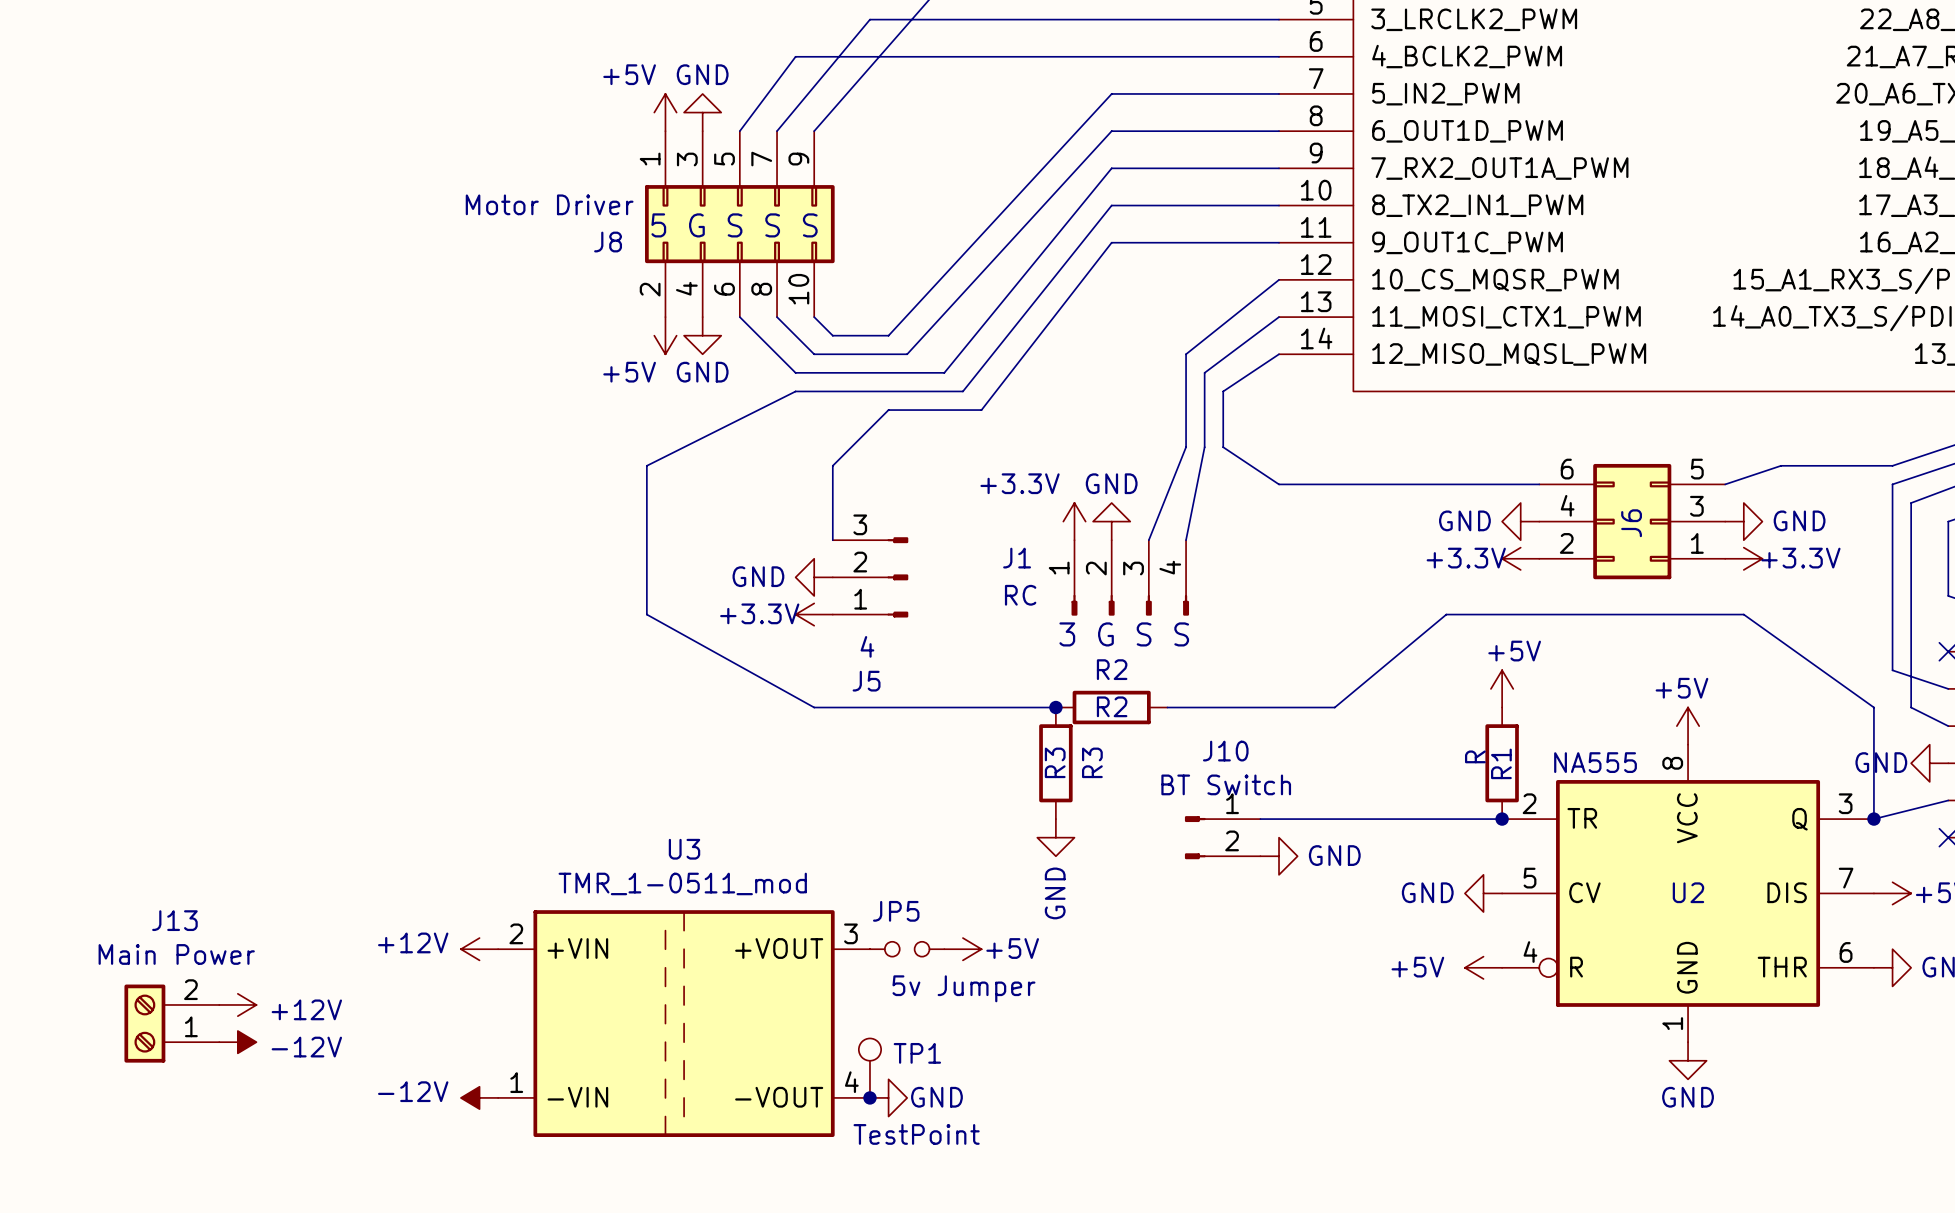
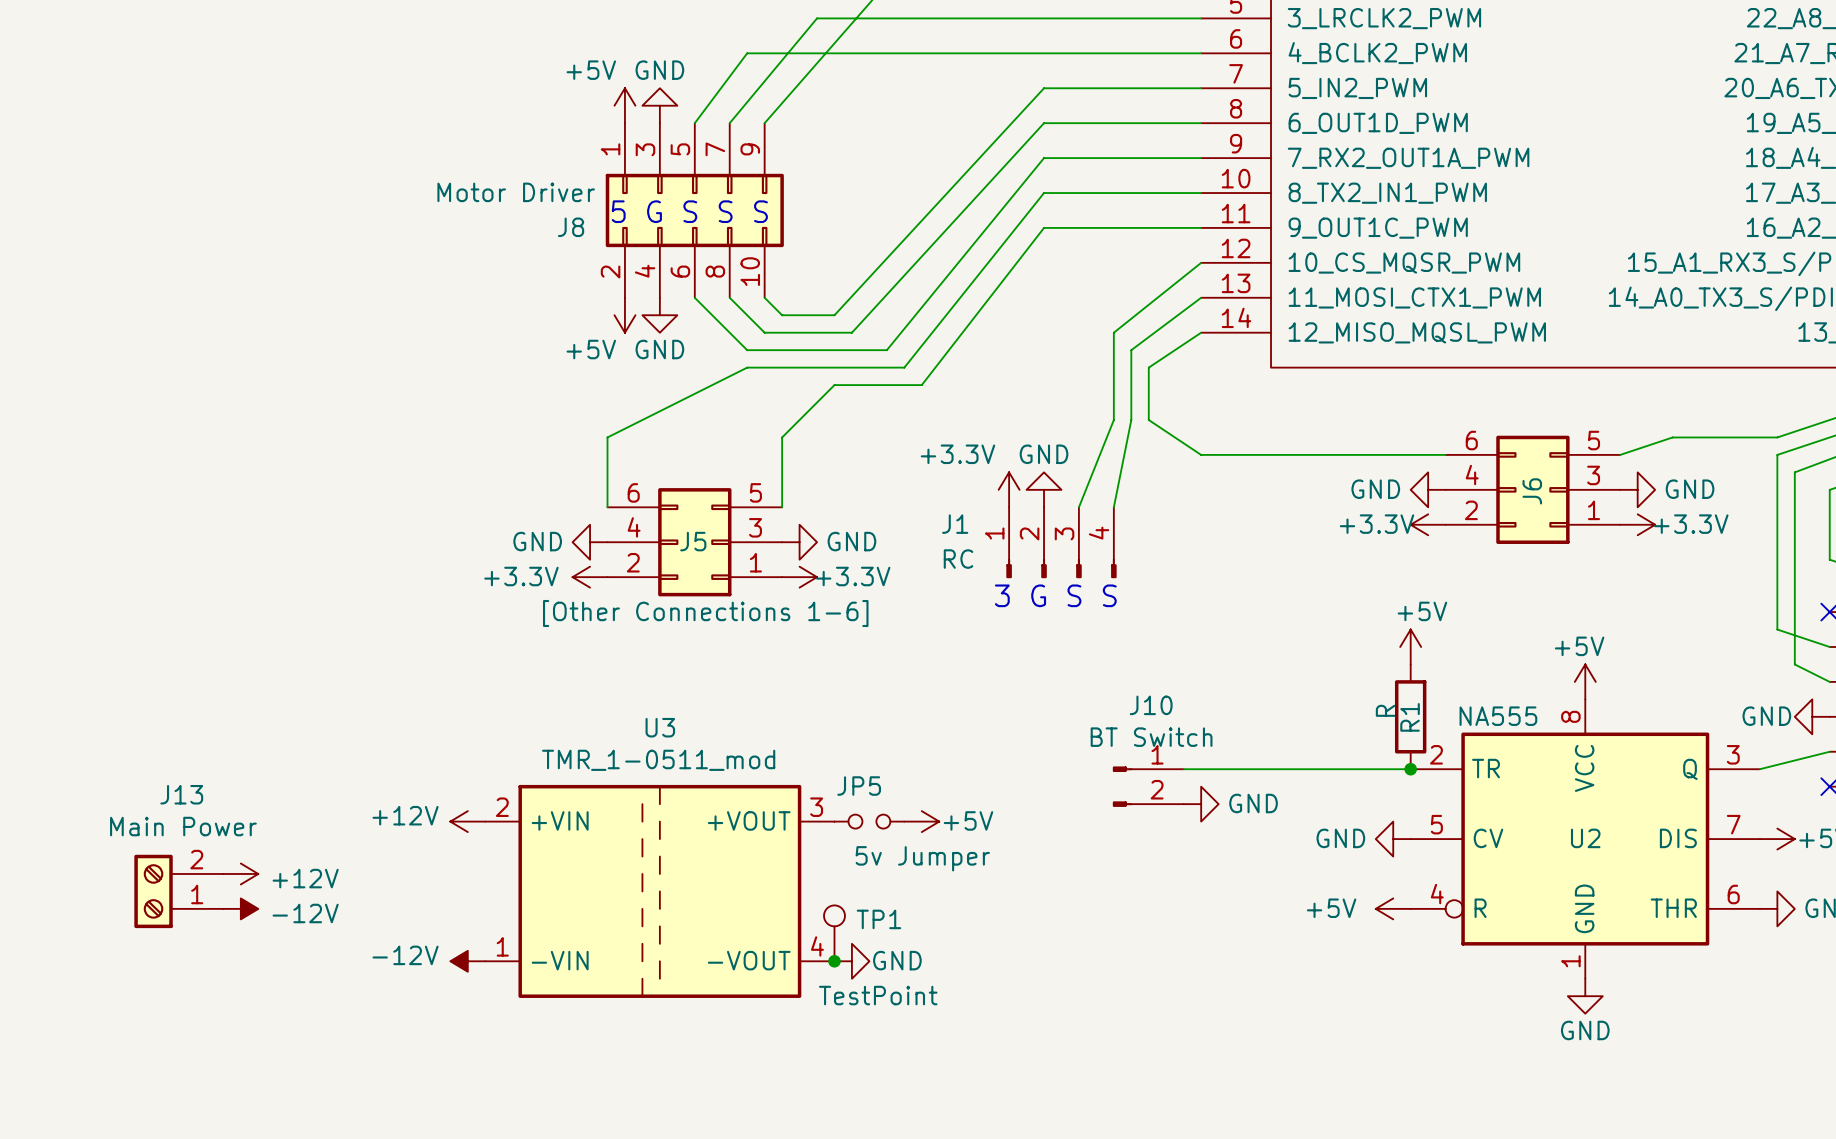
J5 symbol: [832, 537, 909, 618] -> [607, 488, 783, 597]
wire: (646, 540) (646, 614) (814, 707) (1055, 707) -> none
power symbol: none -> GND (590, 542)
power symbol rotation: 0° (814, 577) -> 180° (799, 542)
power symbol position: GND (814, 577) -> GND (799, 542)
power symbol: none -> +3.3V (590, 577)
power symbol rotation: 0° (814, 614) -> 180° (799, 577)
power symbol position: +3.3V (814, 614) -> +3.3V (799, 577)
J5 value: 4 (867, 646) -> [Other Connections 1-6] (705, 613)
J5 name position: J5 (866, 681) -> J5 (693, 541)
junction: (1055, 707) -> none
R2: R2 (1111, 707) -> none
wire: (1167, 707) (1334, 707) (1446, 614) (1743, 614) (1873, 707) (1873, 819) -> none
R3: R3 (1055, 763) -> none
junction: (1873, 819) -> none
power symbol: GND (1055, 837) -> none
power symbol position: +12V (479, 949) -> +12V (467, 821)
JP5 position: (907, 949) -> (869, 821)
power symbol position: +5V (962, 949) -> +5V (921, 821)
power symbol position: +12V (237, 1004) -> +12V (240, 873)
J13 position: (171, 1023) -> (178, 891)
U3 position: (684, 1023) -> (659, 891)
power symbol position: -12V (237, 1042) -> -12V (240, 908)
TP1 position: (869, 1068) -> (834, 933)
power symbol position: -12V (479, 1097) -> -12V (467, 961)
junction position: (869, 1097) -> (834, 961)
power symbol position: GND (888, 1097) -> GND (851, 961)

